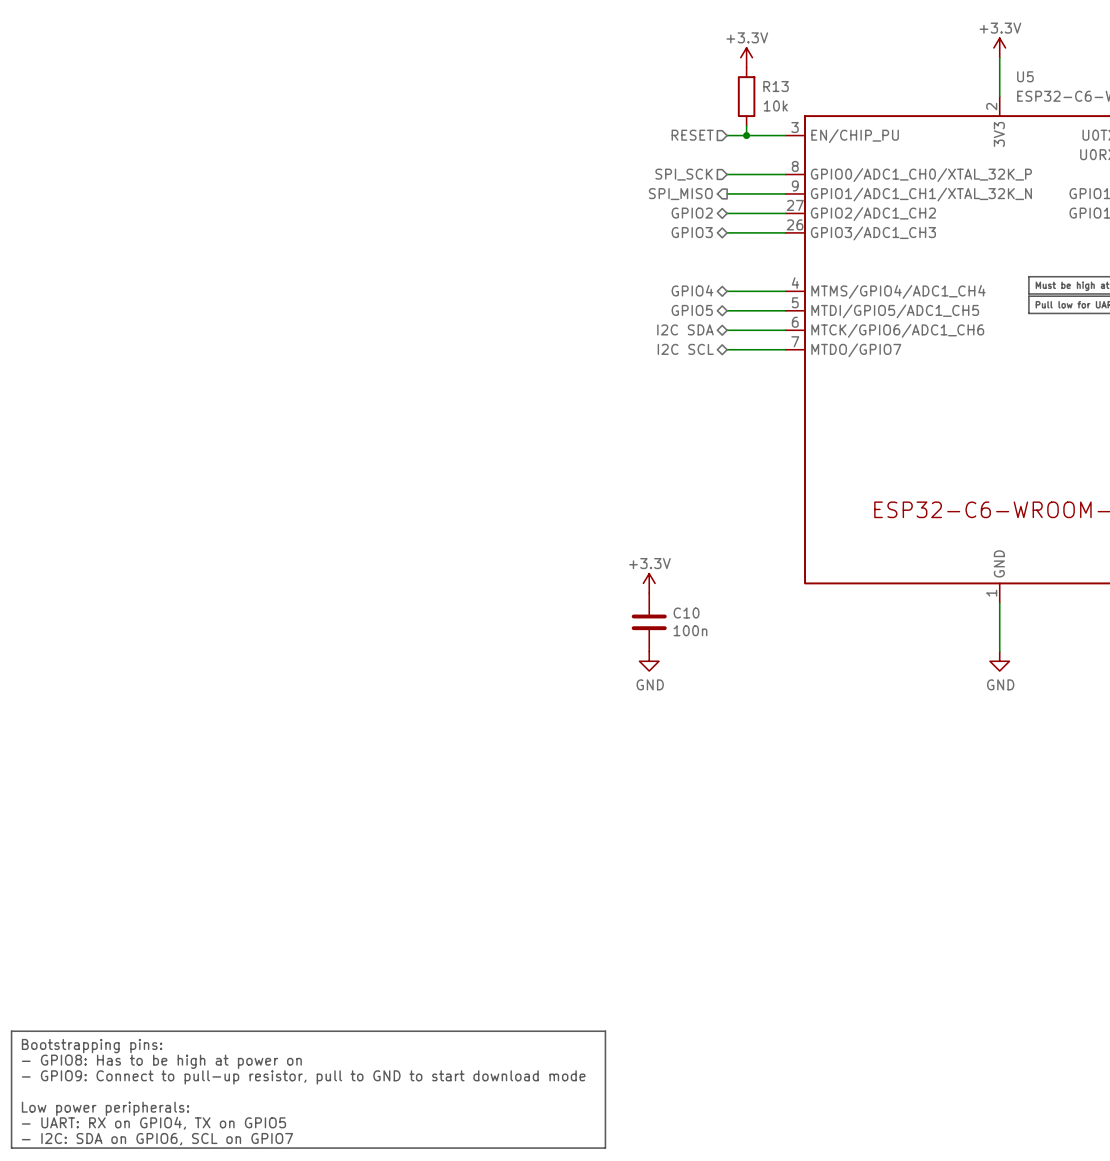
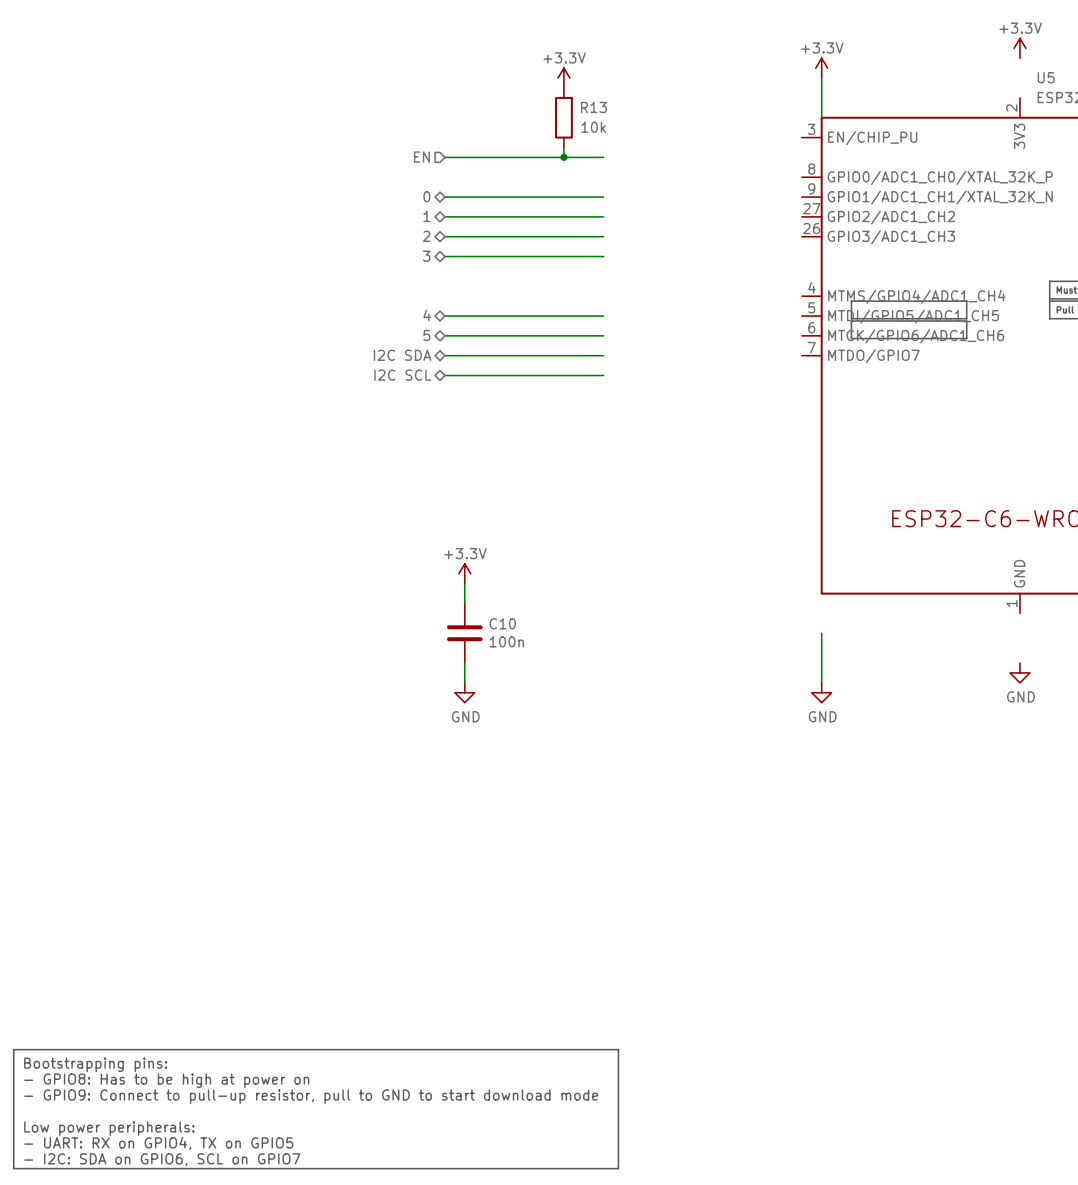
power symbol position: +3.3V (746, 57) -> +3.3V (821, 68)
wire: (999, 57) (999, 96) -> none
power symbol: none -> +3.3V (563, 78)
wire: none -> (821, 78) (821, 117)
R13 position: (746, 96) -> (563, 117)
wire: (746, 125) (746, 135) -> none
hierarchical label: RESET (692, 135) -> none
wire: (727, 135) (785, 135) -> none
junction: (746, 135) -> none
wire: none -> (563, 147) (563, 157)
hierarchical label: none -> EN (421, 157)
wire: none -> (444, 157) (603, 157)
junction: none -> (563, 157)
hierarchical label: SPI_SCK (684, 174) -> none
wire: (727, 174) (785, 174) -> none
hierarchical label: none -> 0 (426, 196)
wire: none -> (444, 197) (603, 197)
wire: (727, 193) (785, 193) -> none
hierarchical label: SPI_MISO (680, 194) -> none
hierarchical label: none -> 1 (426, 216)
wire: none -> (444, 216) (603, 216)
hierarchical label: GPIO2 (692, 213) -> none
wire: (727, 213) (785, 213) -> none
hierarchical label: none -> 2 (426, 236)
wire: none -> (444, 236) (603, 236)
hierarchical label: GPIO3 (692, 232) -> none
wire: (727, 232) (785, 232) -> none
hierarchical label: none -> 3 (426, 256)
wire: none -> (444, 256) (603, 256)
hierarchical label: GPIO4 (692, 290) -> none
wire: (727, 291) (785, 291) -> none
line: none -> (851, 301) (851, 318) (966, 318) (966, 301) (851, 301)
hierarchical label: none -> 4 (427, 315)
wire: none -> (444, 316) (603, 316)
hierarchical label: GPIO5 (692, 310) -> none
wire: (727, 310) (785, 310) -> none
line: none -> (851, 320) (966, 320) (966, 338) (851, 338) (851, 320)
hierarchical label: none -> 5 (426, 335)
hierarchical label: I2C SDA (685, 329) -> none
wire: none -> (444, 335) (603, 335)
wire: (727, 330) (785, 330) -> none
hierarchical label: none -> I2C SDA (402, 355)
wire: none -> (444, 355) (603, 355)
hierarchical label: I2C SCL (685, 349) -> none
wire: (727, 349) (785, 349) -> none
hierarchical label: none -> I2C SCL (402, 375)
wire: none -> (444, 375) (603, 375)
power symbol: none -> +3.3V (464, 573)
wire: none -> (464, 583) (464, 603)
power symbol: +3.3V (649, 583) -> none
wire: (999, 602) (999, 651) -> none
C10 position: (649, 622) -> (464, 633)
wire: none -> (821, 633) (821, 682)
wire: none -> (464, 663) (464, 682)
power symbol: GND (649, 661) -> none
power symbol: none -> GND (464, 692)
power symbol: none -> GND (821, 692)

